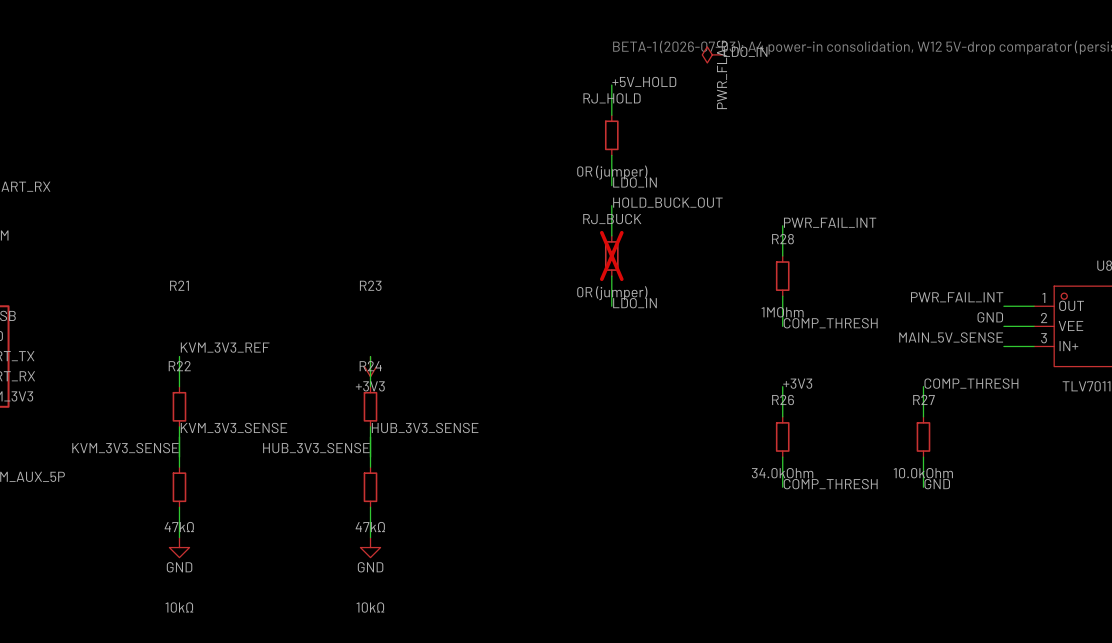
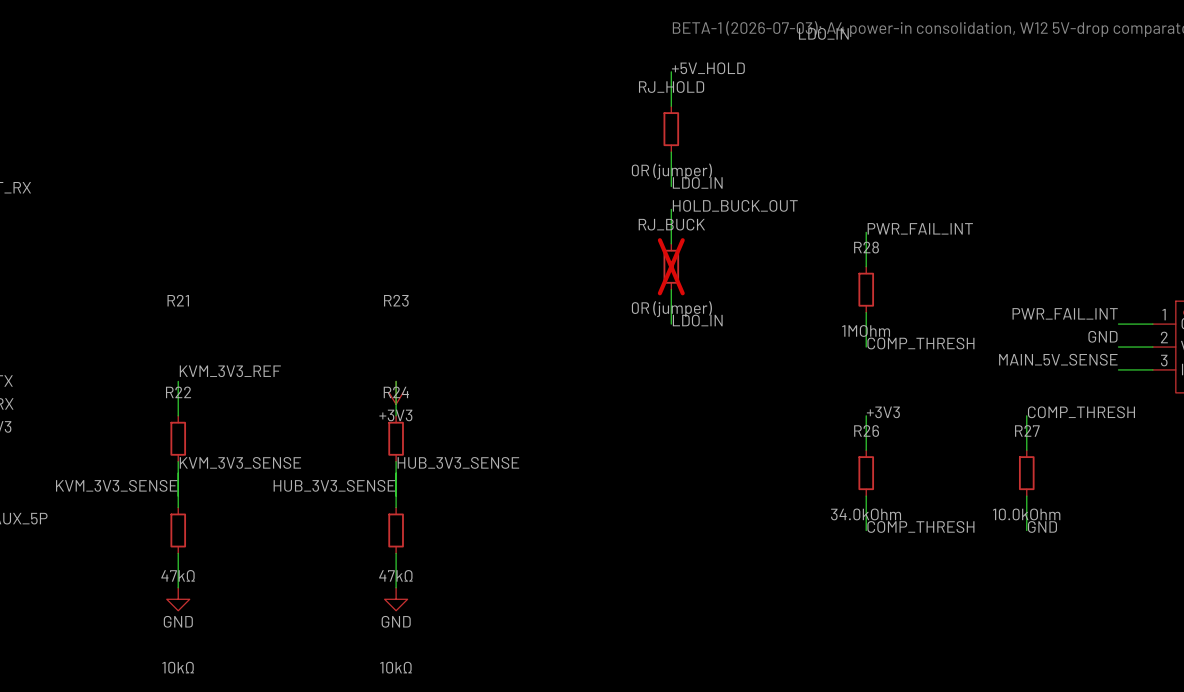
power symbol: PWR_FLAG (712, 54) -> none

